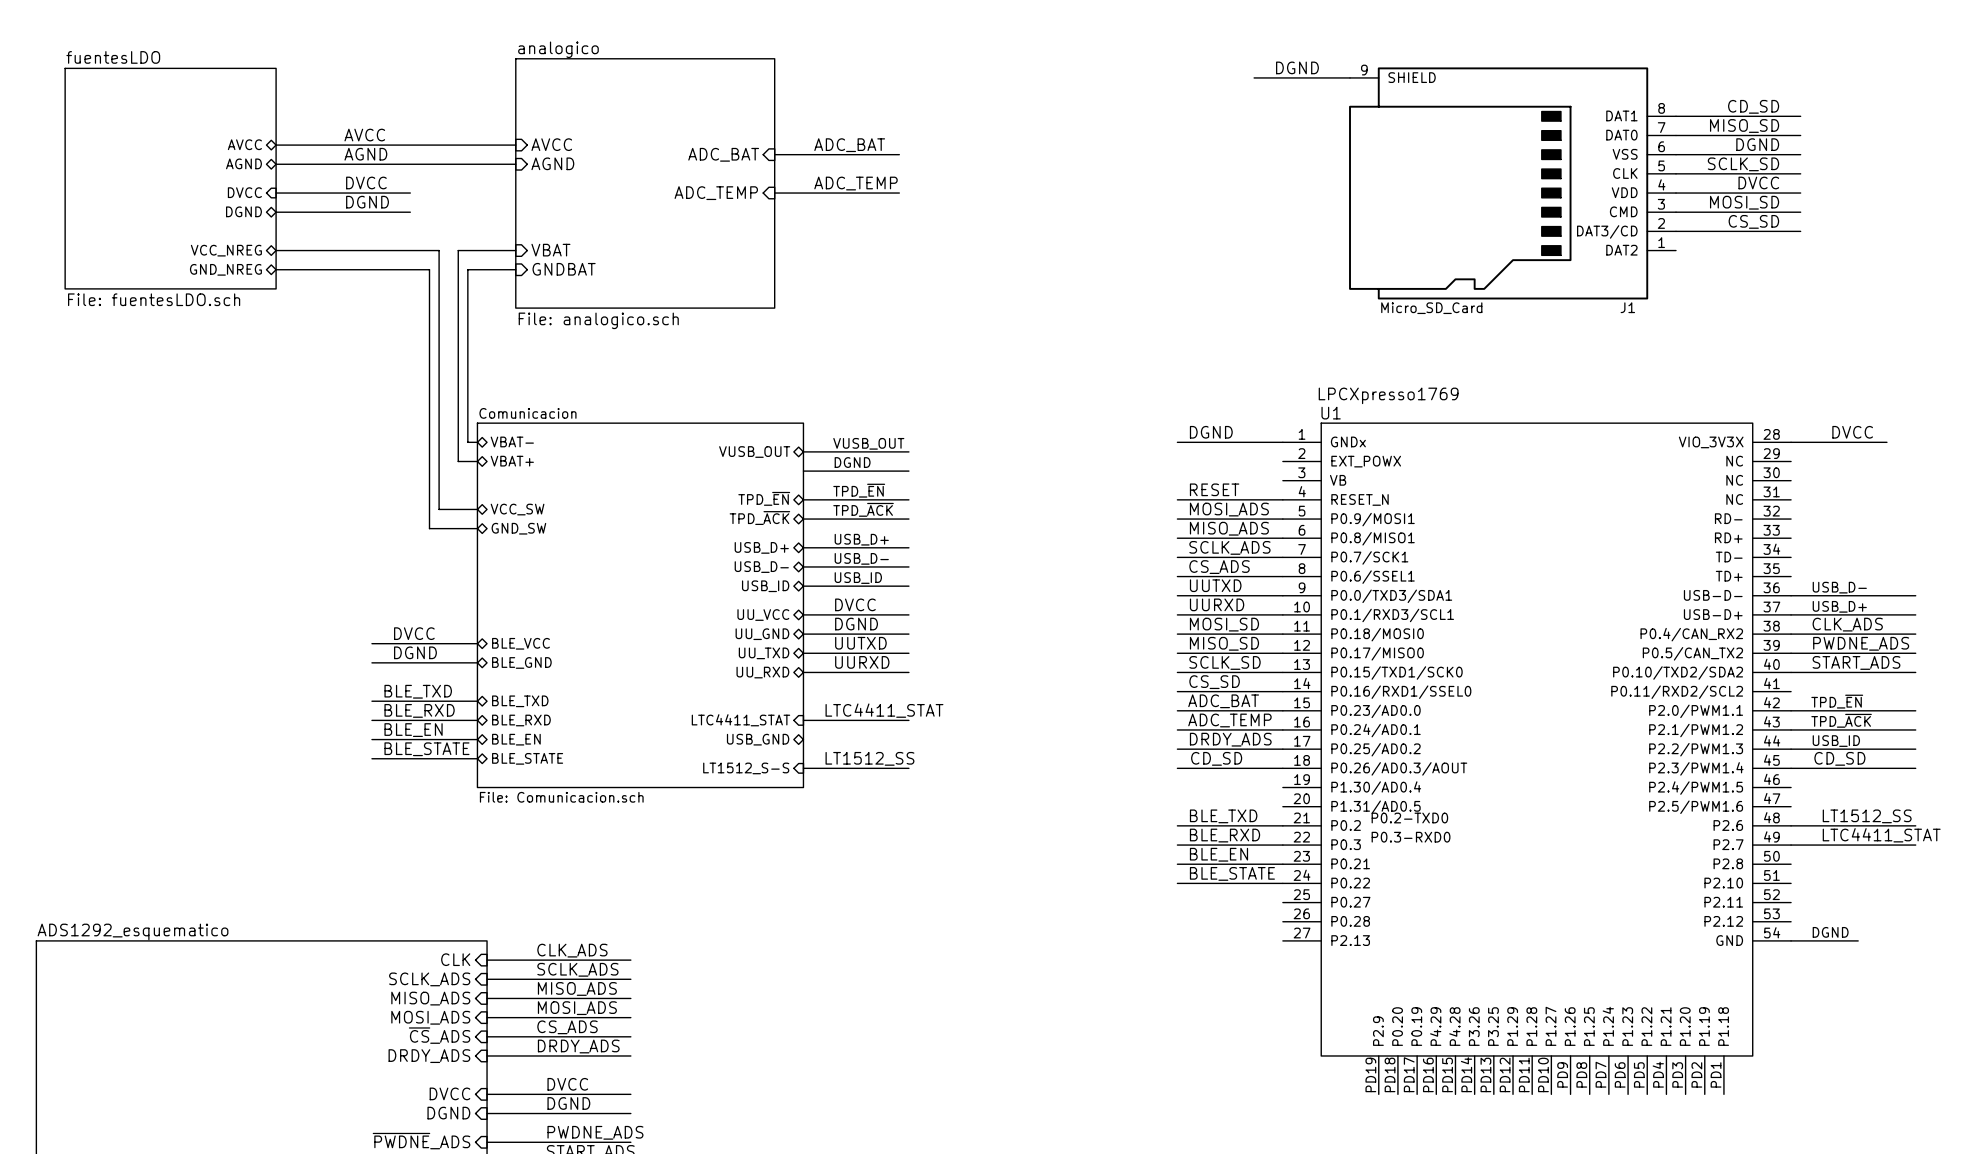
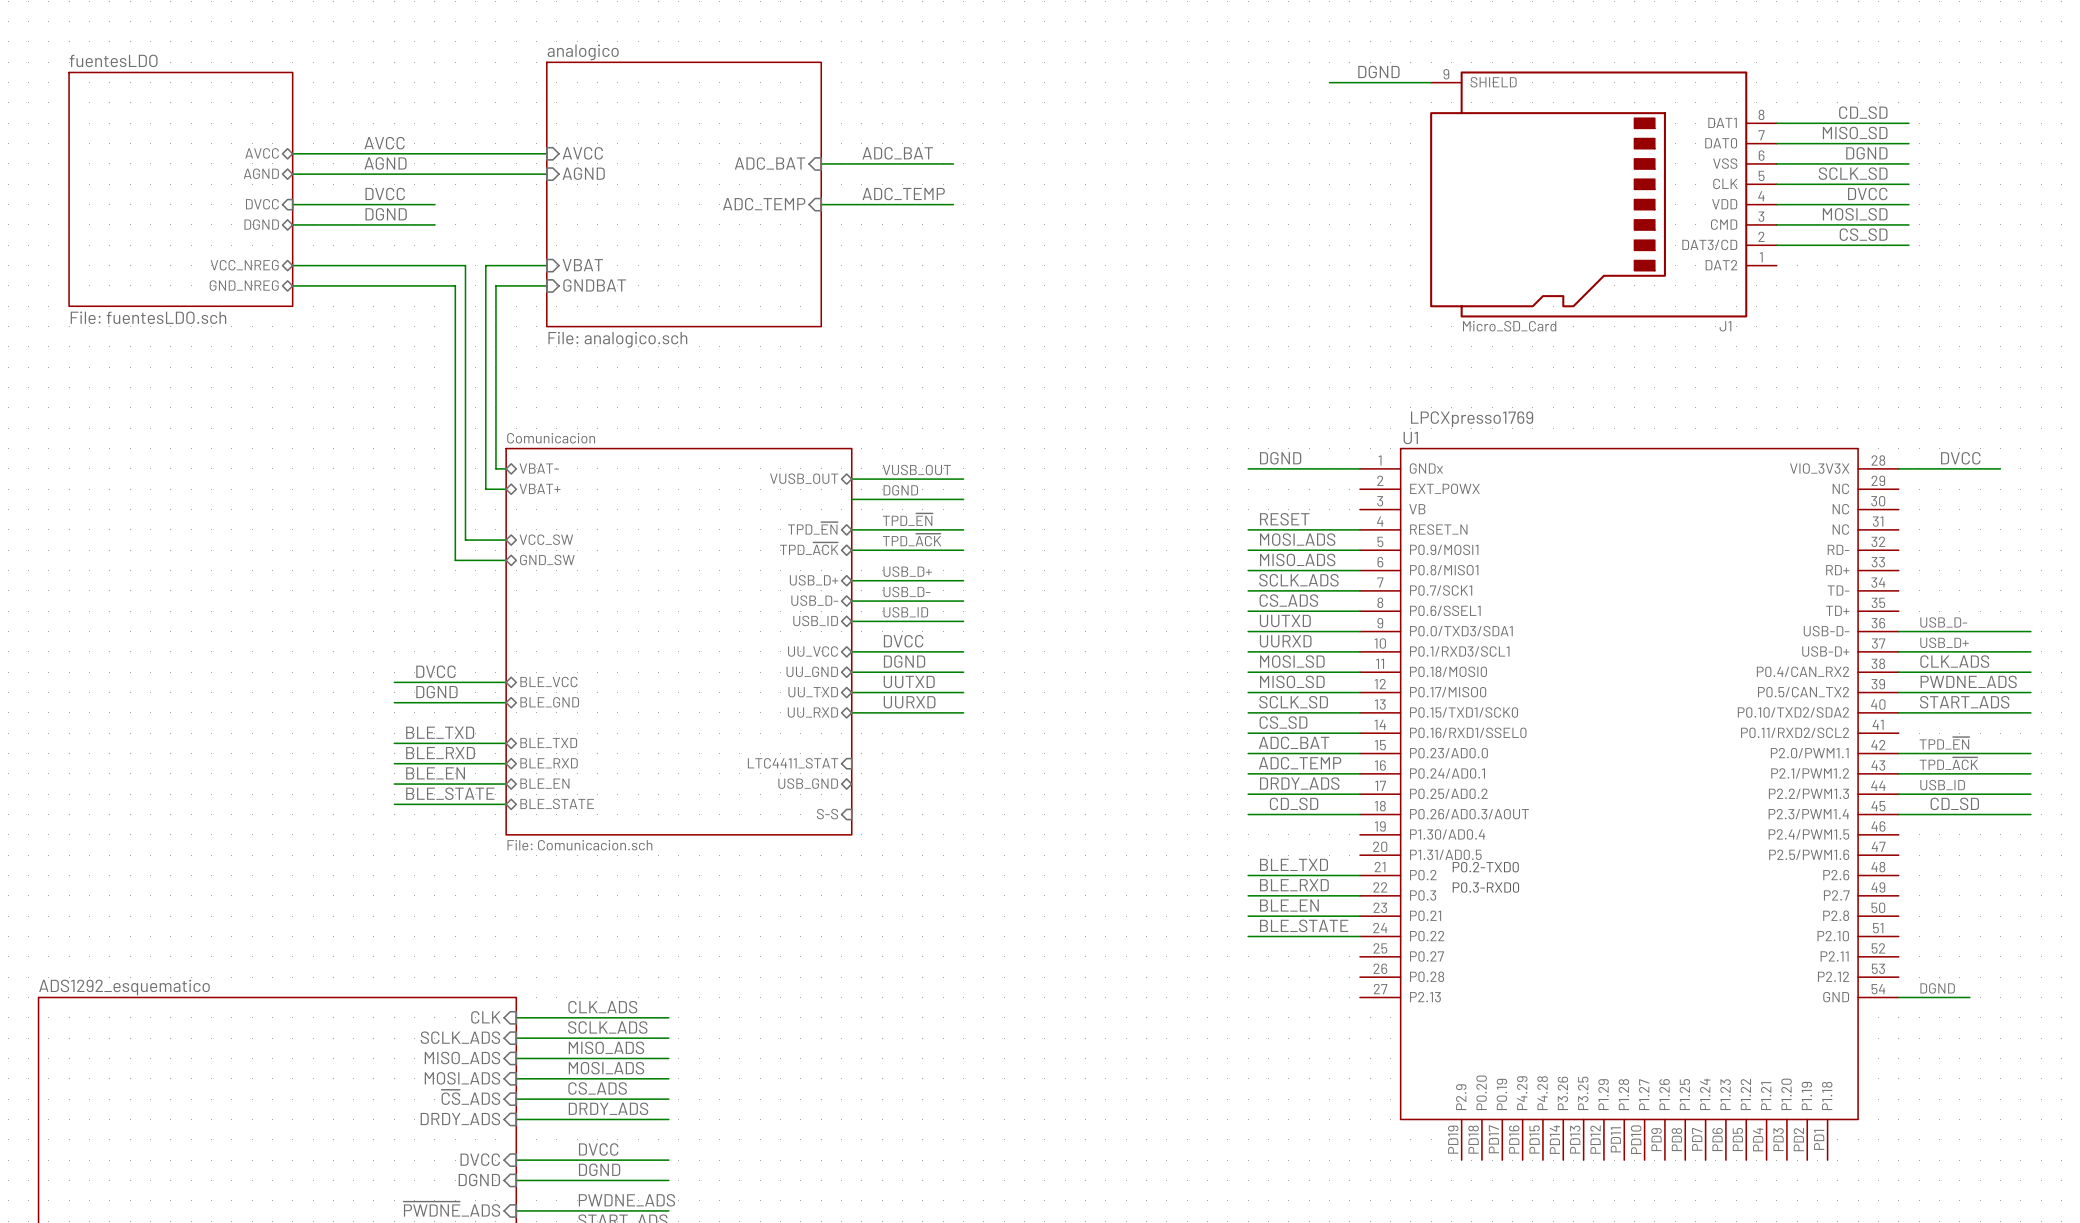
label: LTC4411_STAT (884, 710) -> none
wire: (803, 720) (908, 720) -> none
label: LT1512_SS (869, 758) -> none
sheet pin: LT1512_S-S (746, 768) -> S-S (827, 814)
wire: (803, 768) (908, 768) -> none
label: LT1512_SS (1867, 816) -> none
wire: (1791, 825) (1915, 825) -> none
label: LTC4411_STAT (1881, 835) -> none
wire: (1791, 845) (1915, 845) -> none

